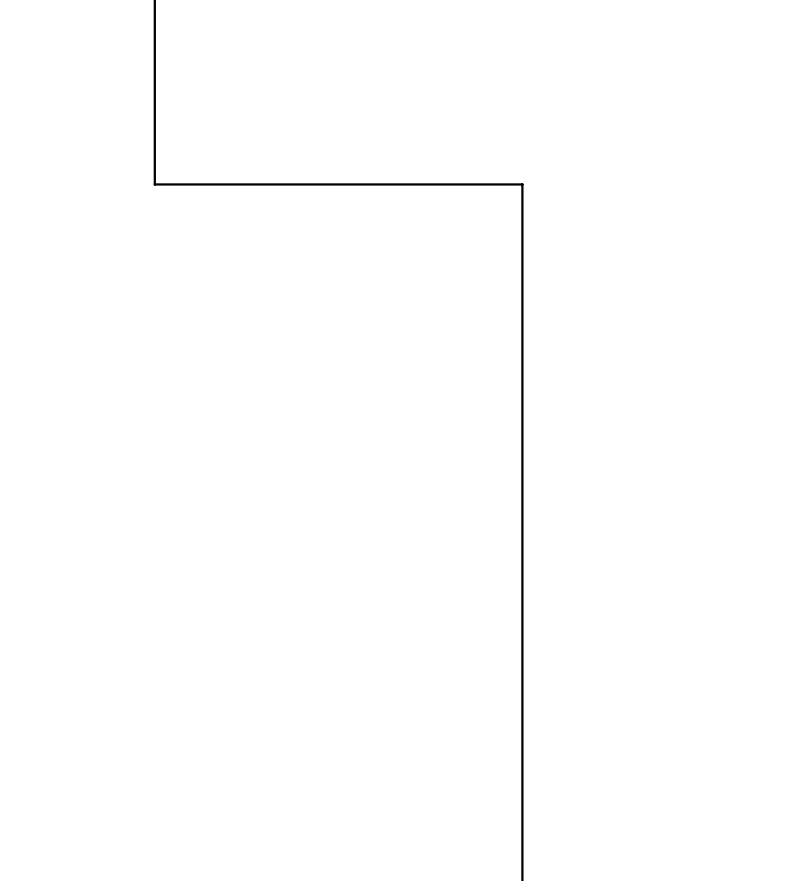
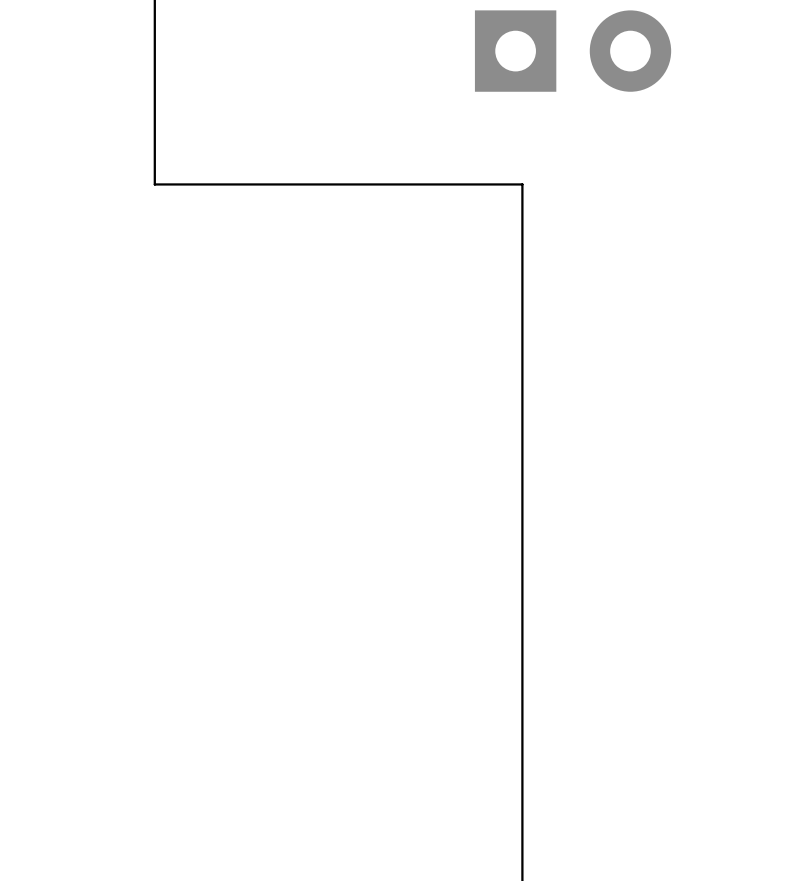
part: none -> (573, 51)

